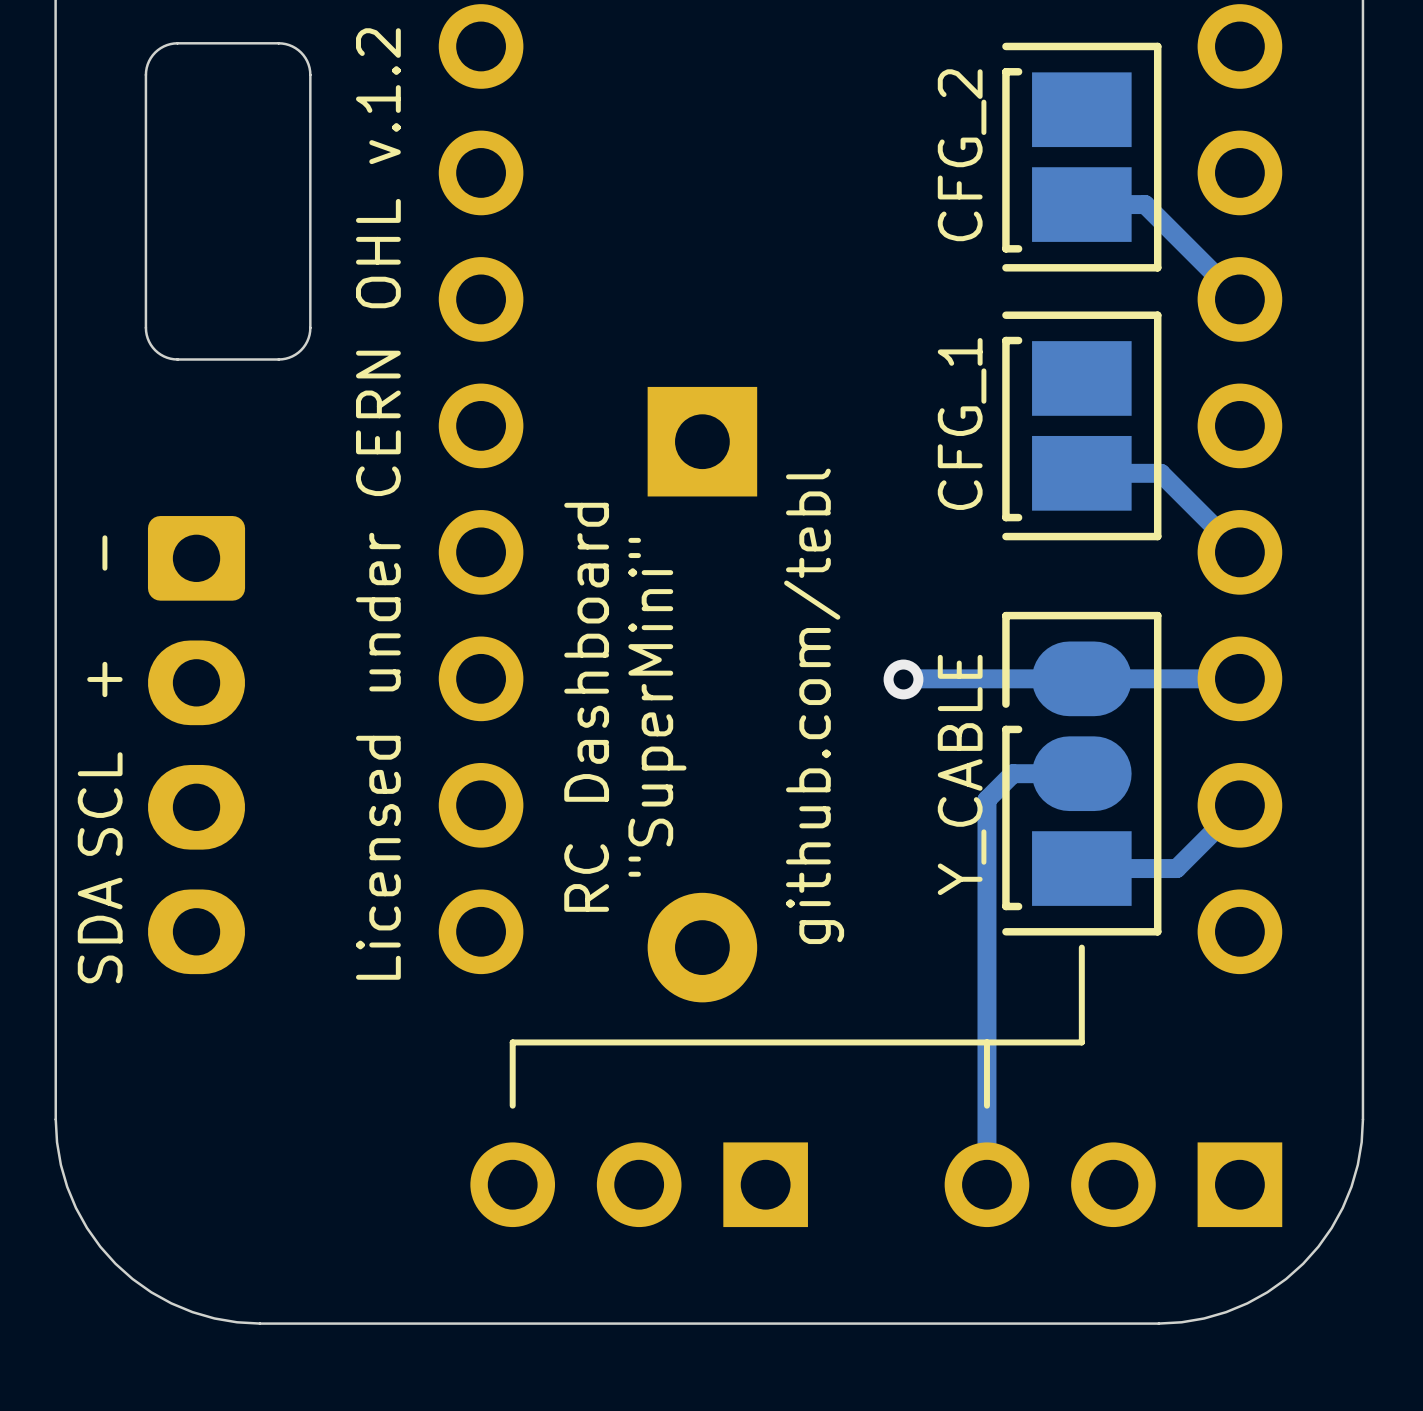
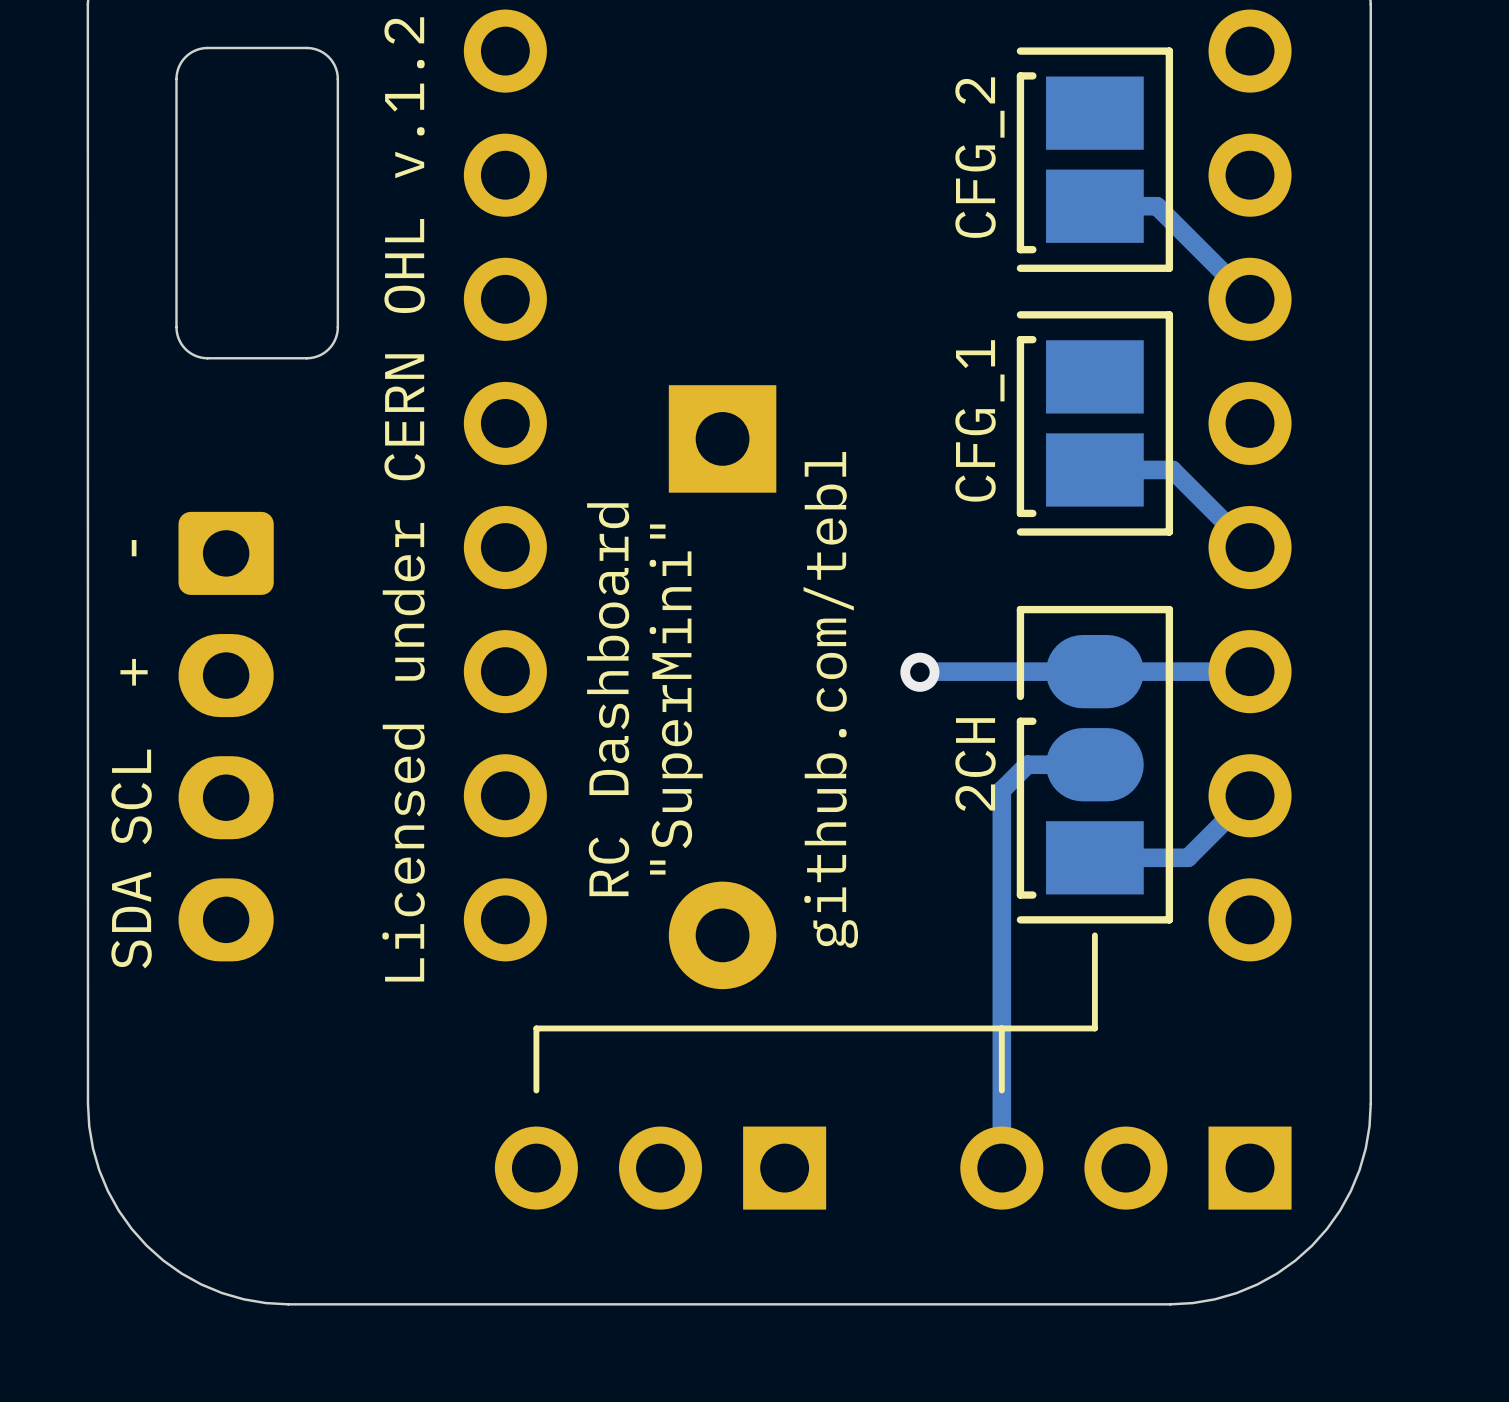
part value: Y_CABLE (962, 774) -> 2CH (975, 764)

